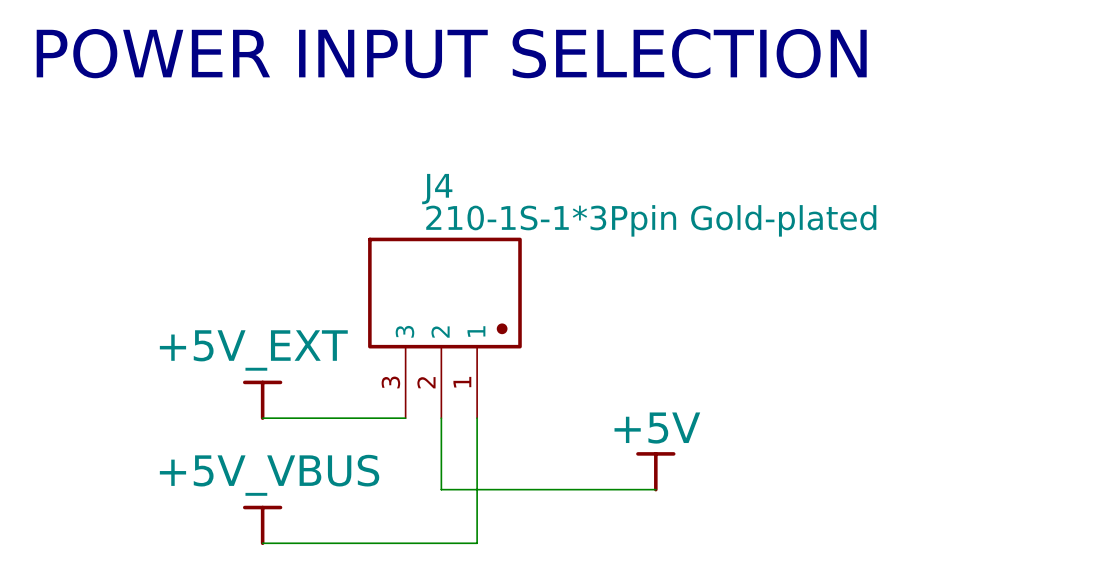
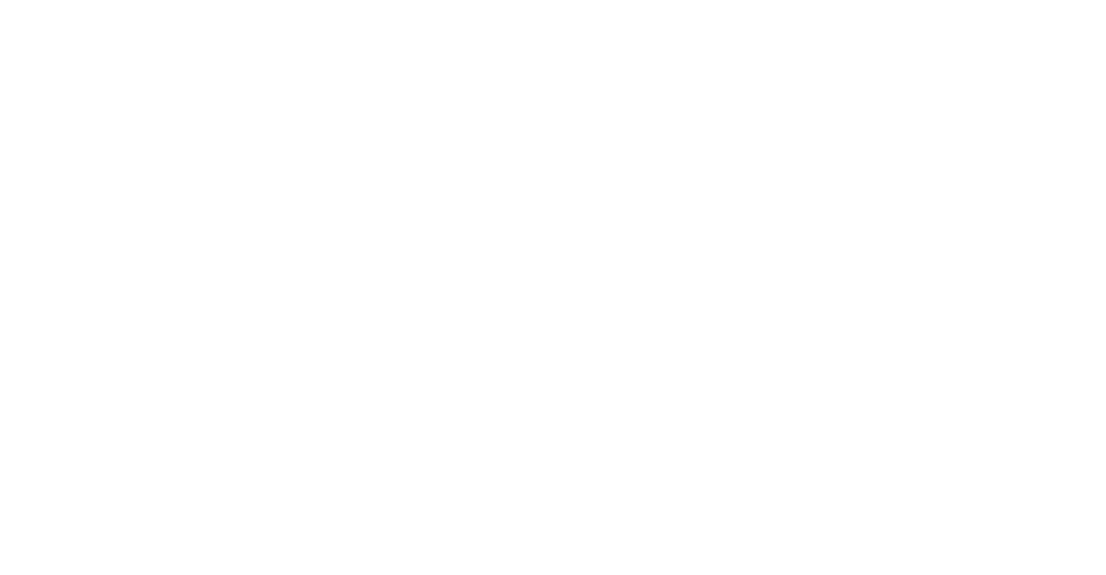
text: POWER INPUT SELECTION (451, 53) -> none
J4: 210-1S-1*3Ppin Gold-plated (444, 327) -> none
power symbol: +5V_EXT (262, 400) -> none
wire: (262, 418) (405, 418) -> none
wire: (441, 418) (441, 489) (655, 489) -> none
wire: (477, 418) (477, 543) (262, 543) -> none
power symbol: +5V (655, 471) -> none
power symbol: +5V_VBUS (262, 525) -> none

